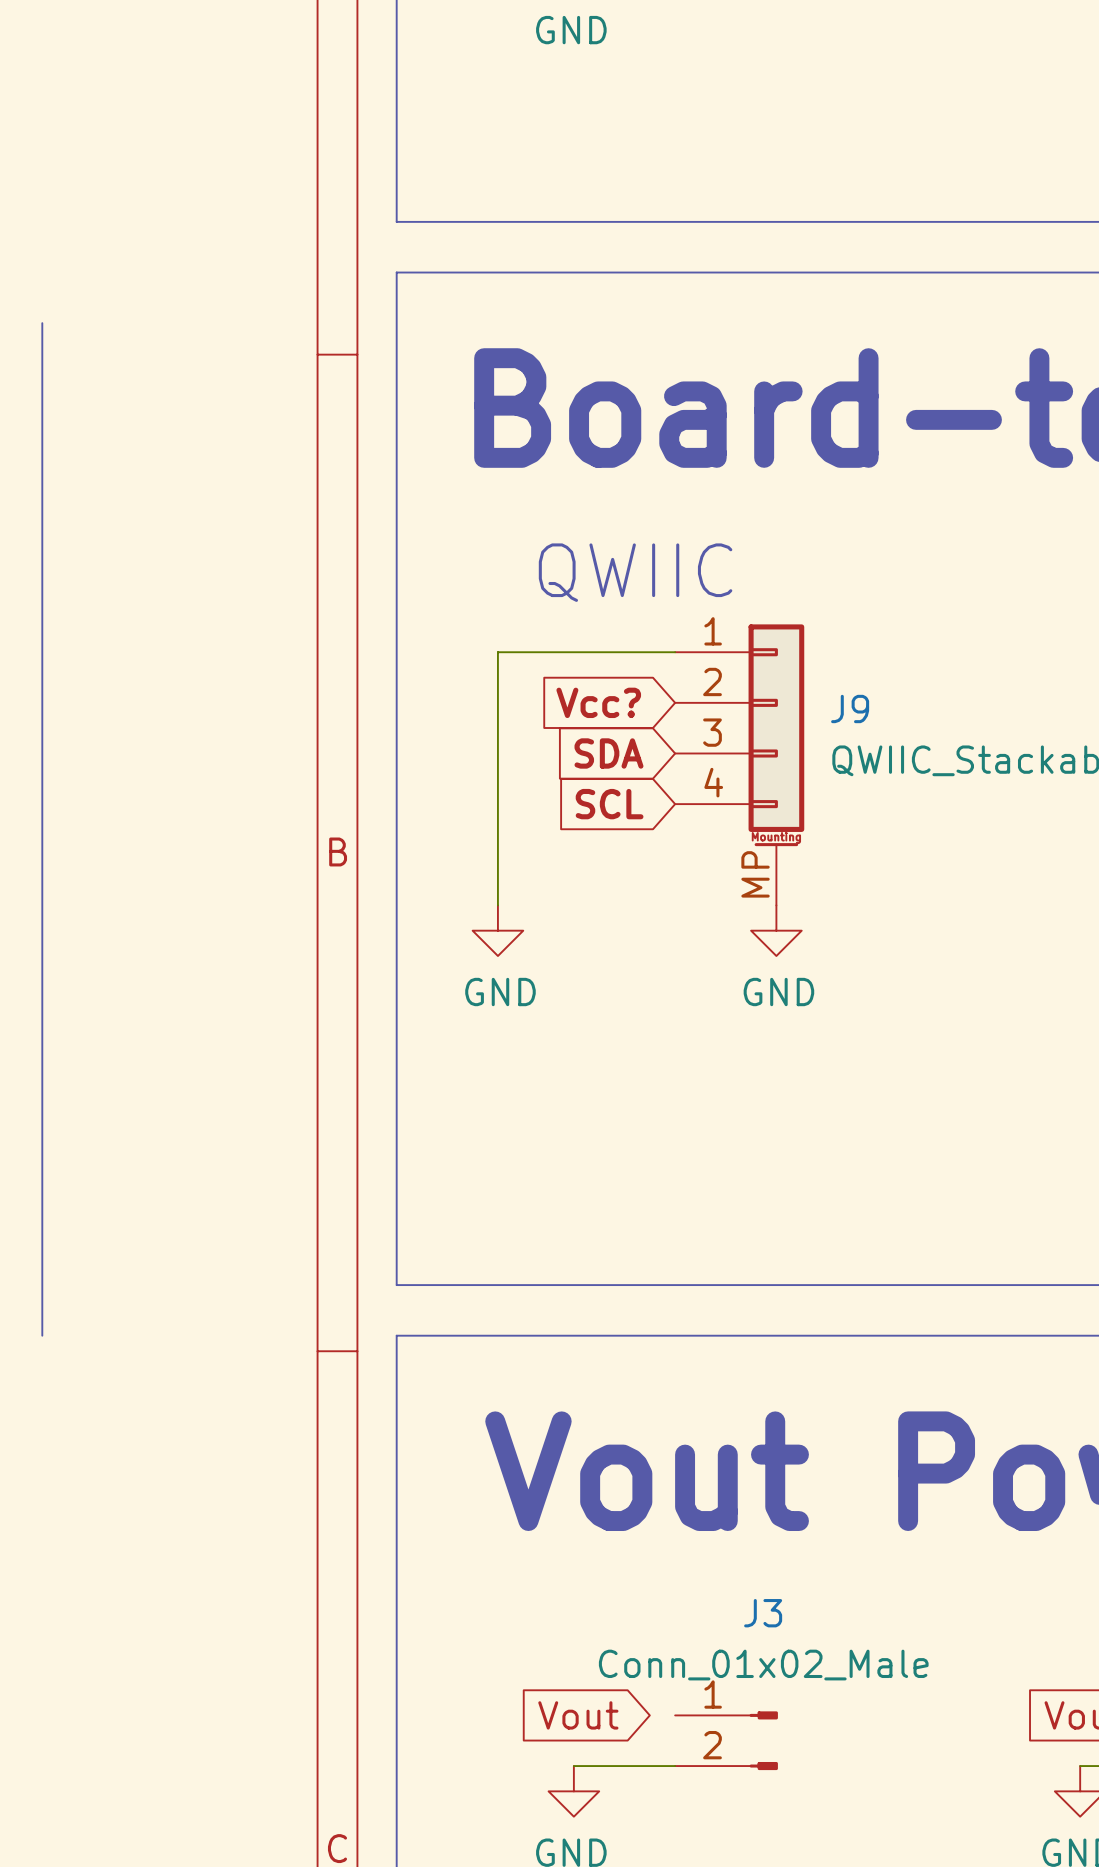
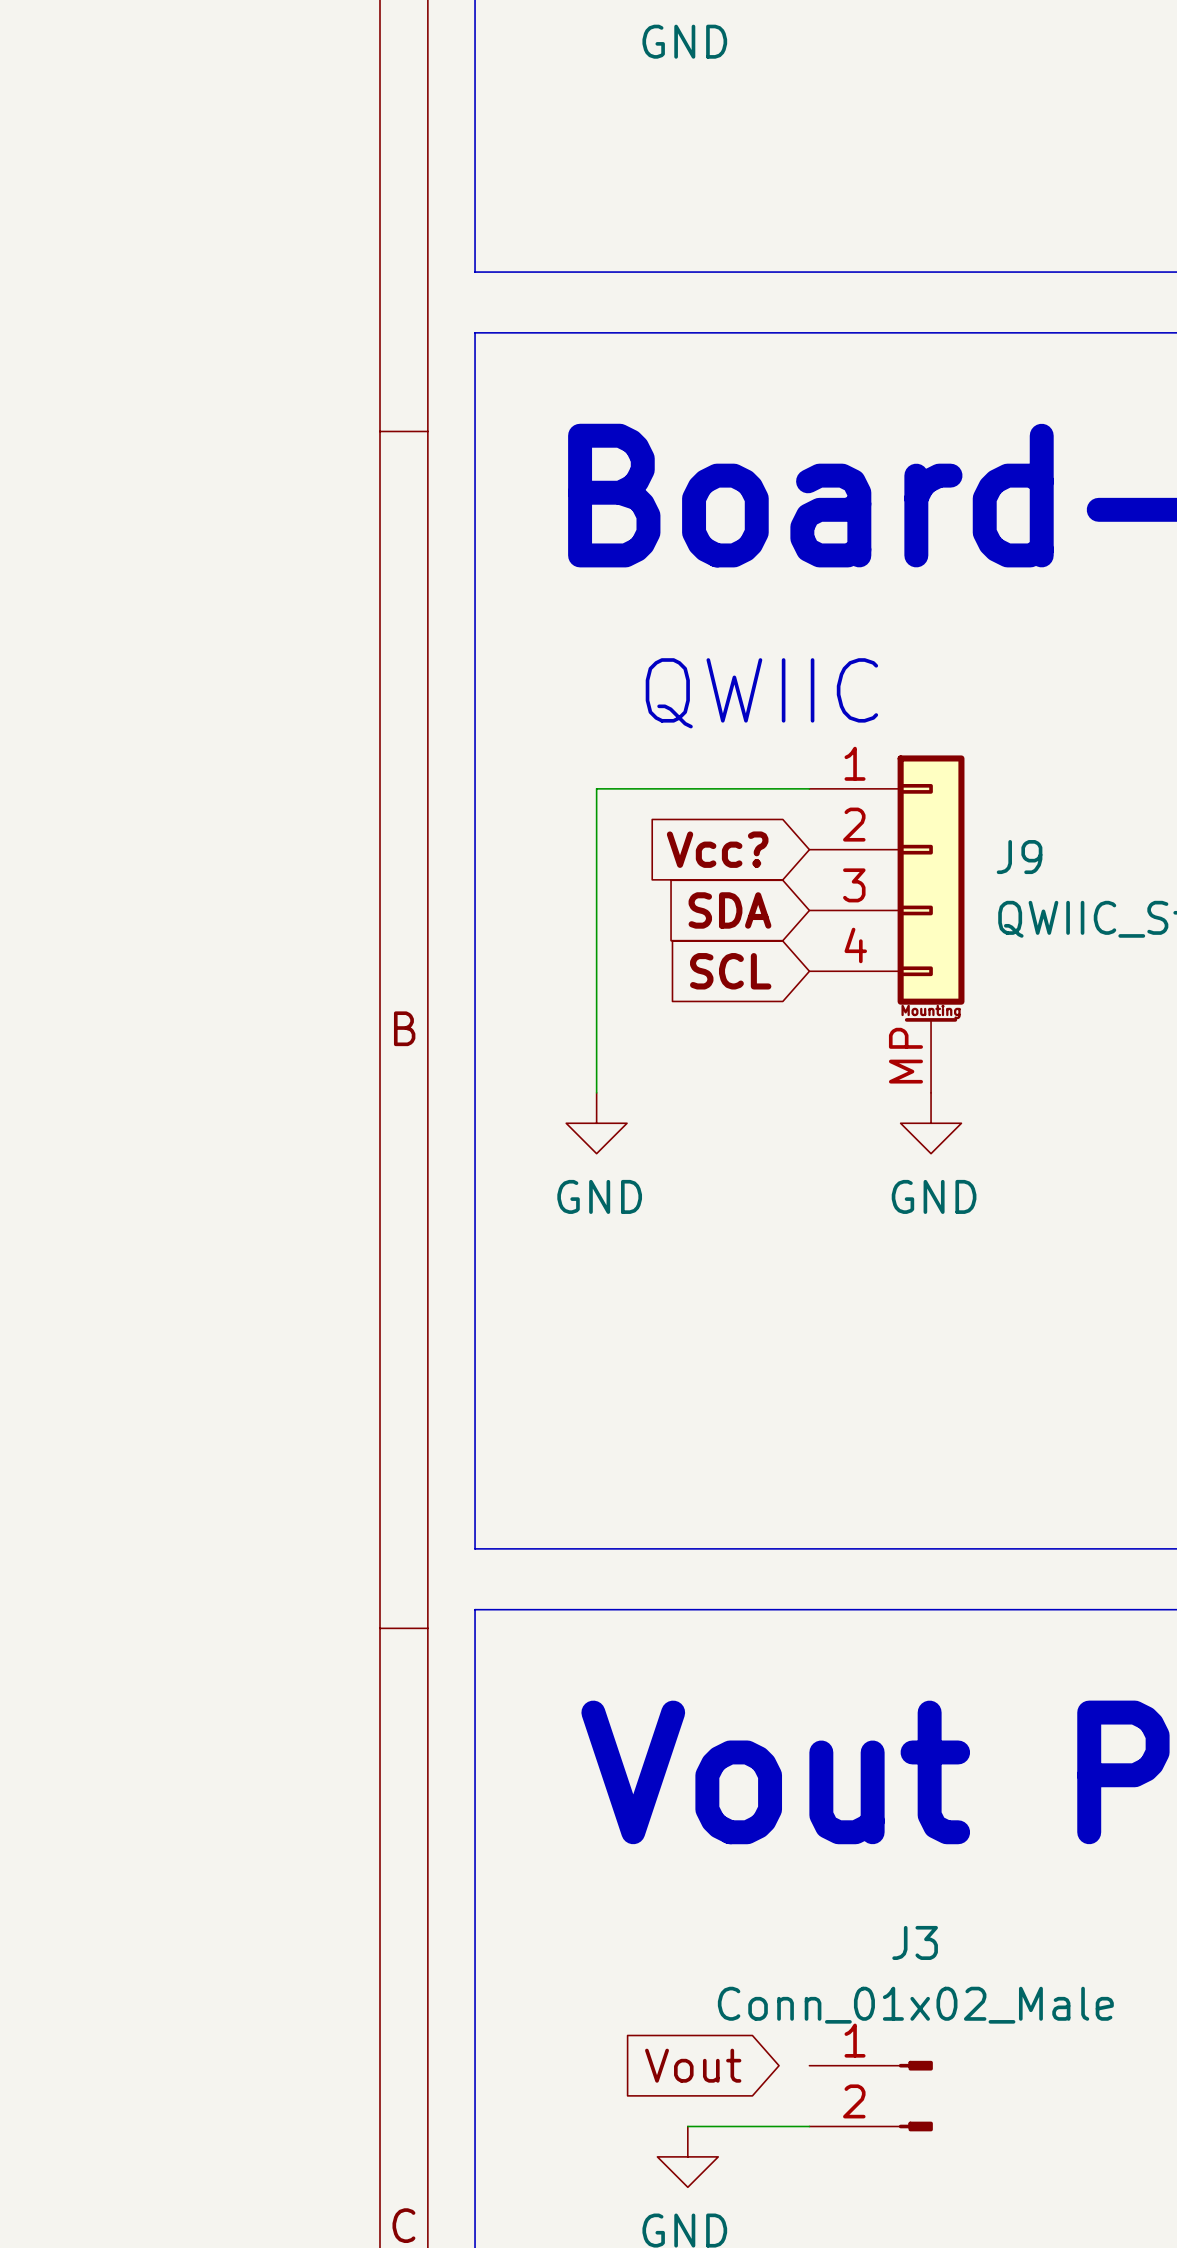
line: (42, 323) (42, 1335) -> none

